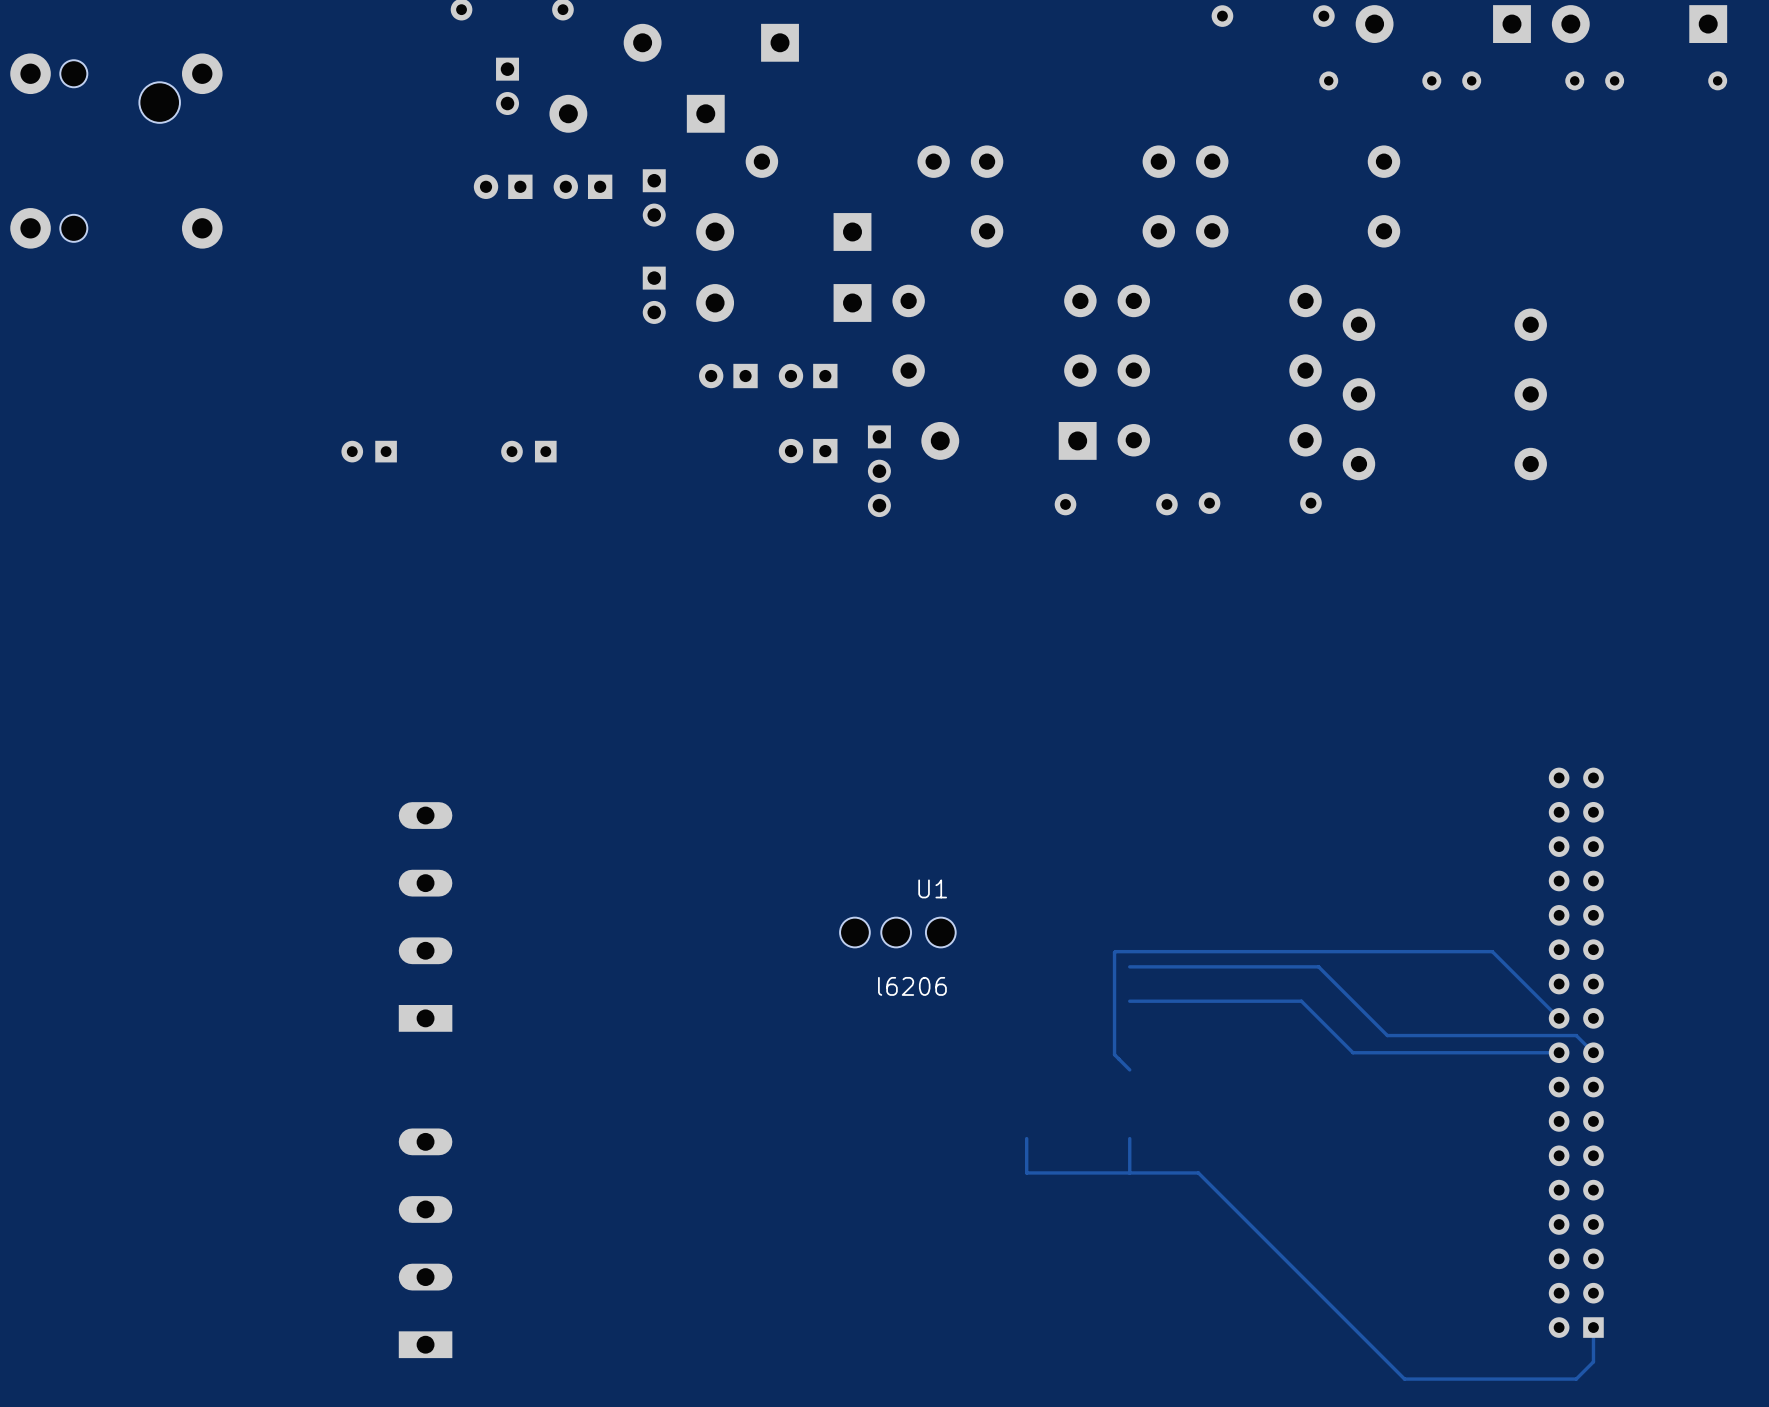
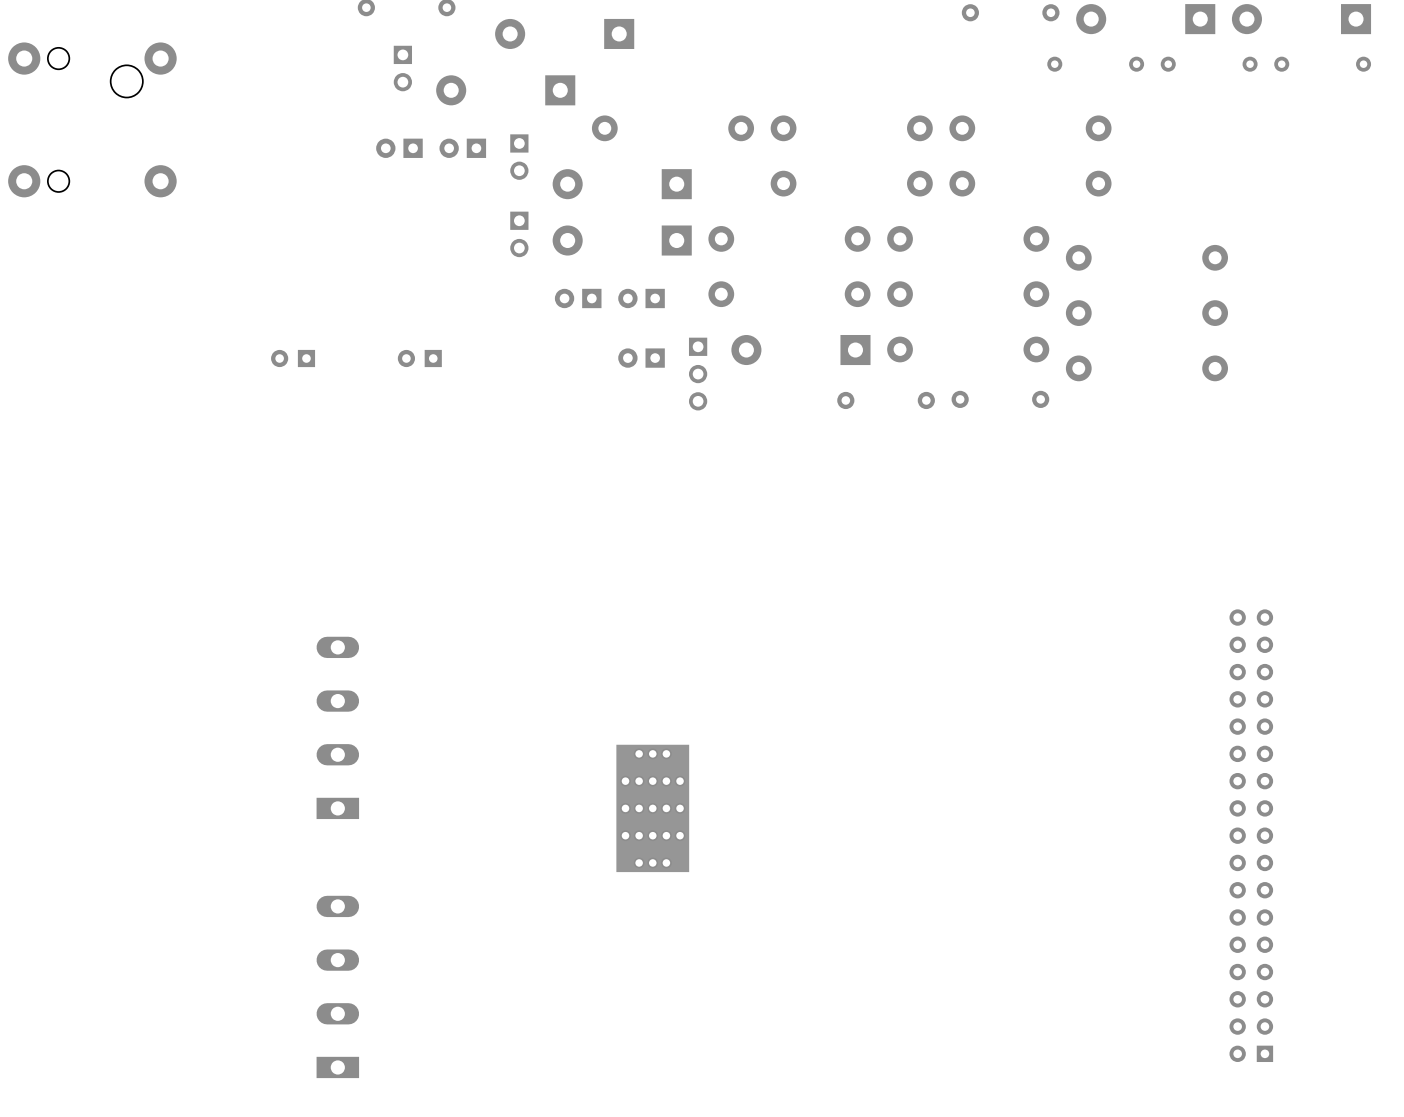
part: (854, 932) -> none
part: (896, 932) -> none
part: (940, 932) -> none
U1: l6206 (912, 937) -> none
track: (1129, 966) (1318, 966) (1387, 1035) (1576, 1035) (1593, 1052) -> none
track: (1129, 1001) (1301, 1001) (1353, 1052) (1559, 1052) -> none
part: none -> (652, 808)
track: (1559, 1018) (1492, 951) (1115, 951) (1114, 1054) (1129, 1069) -> none
track: (1026, 1138) (1026, 1172) (1198, 1172) (1404, 1379) (1576, 1379) (1593, 1361) (1593, 1327) -> none
track: (1129, 1138) (1129, 1172) -> none

